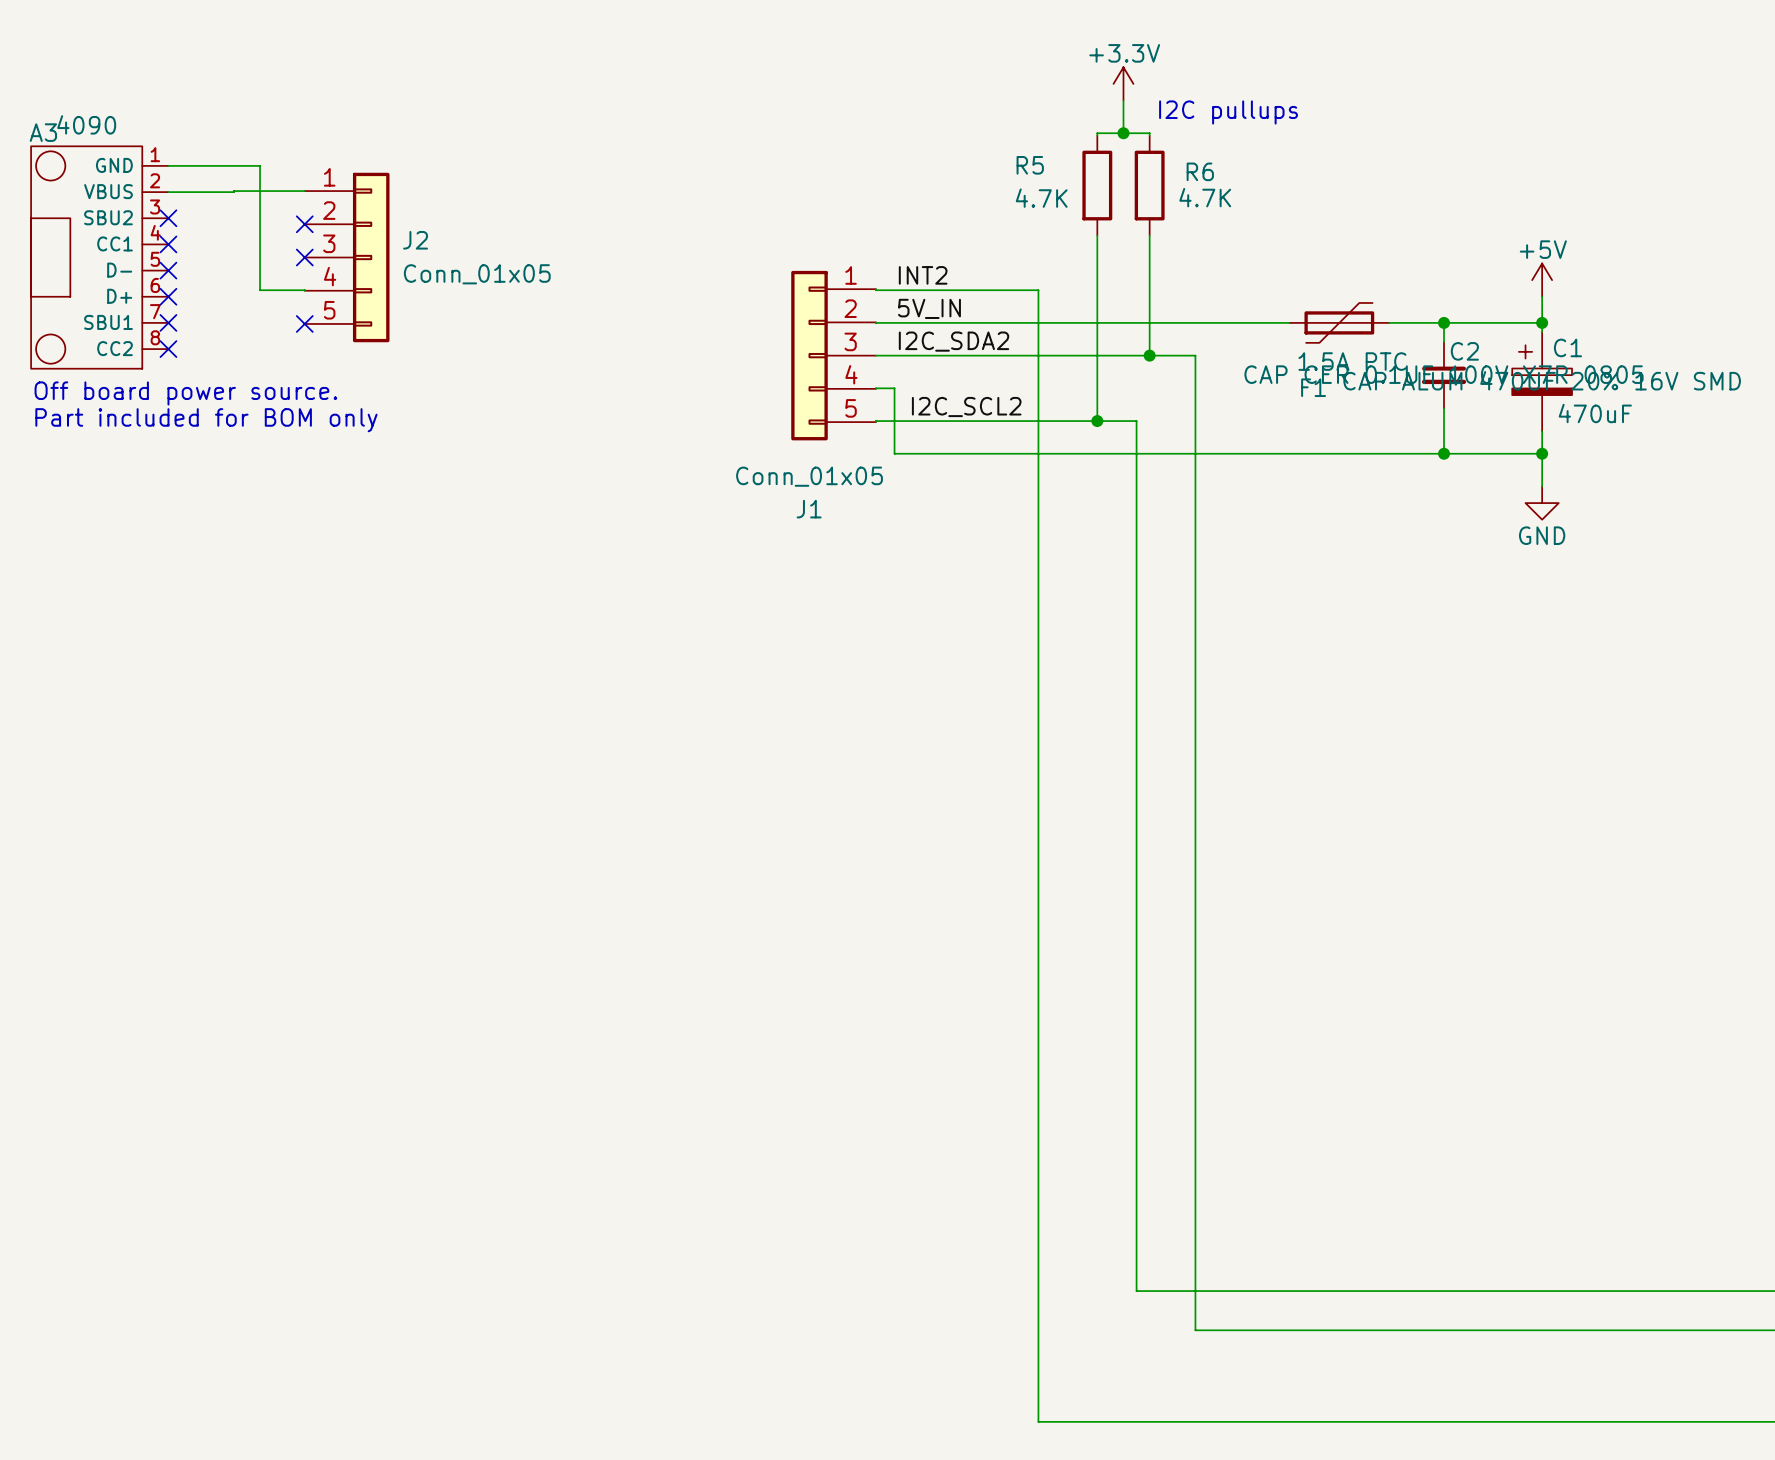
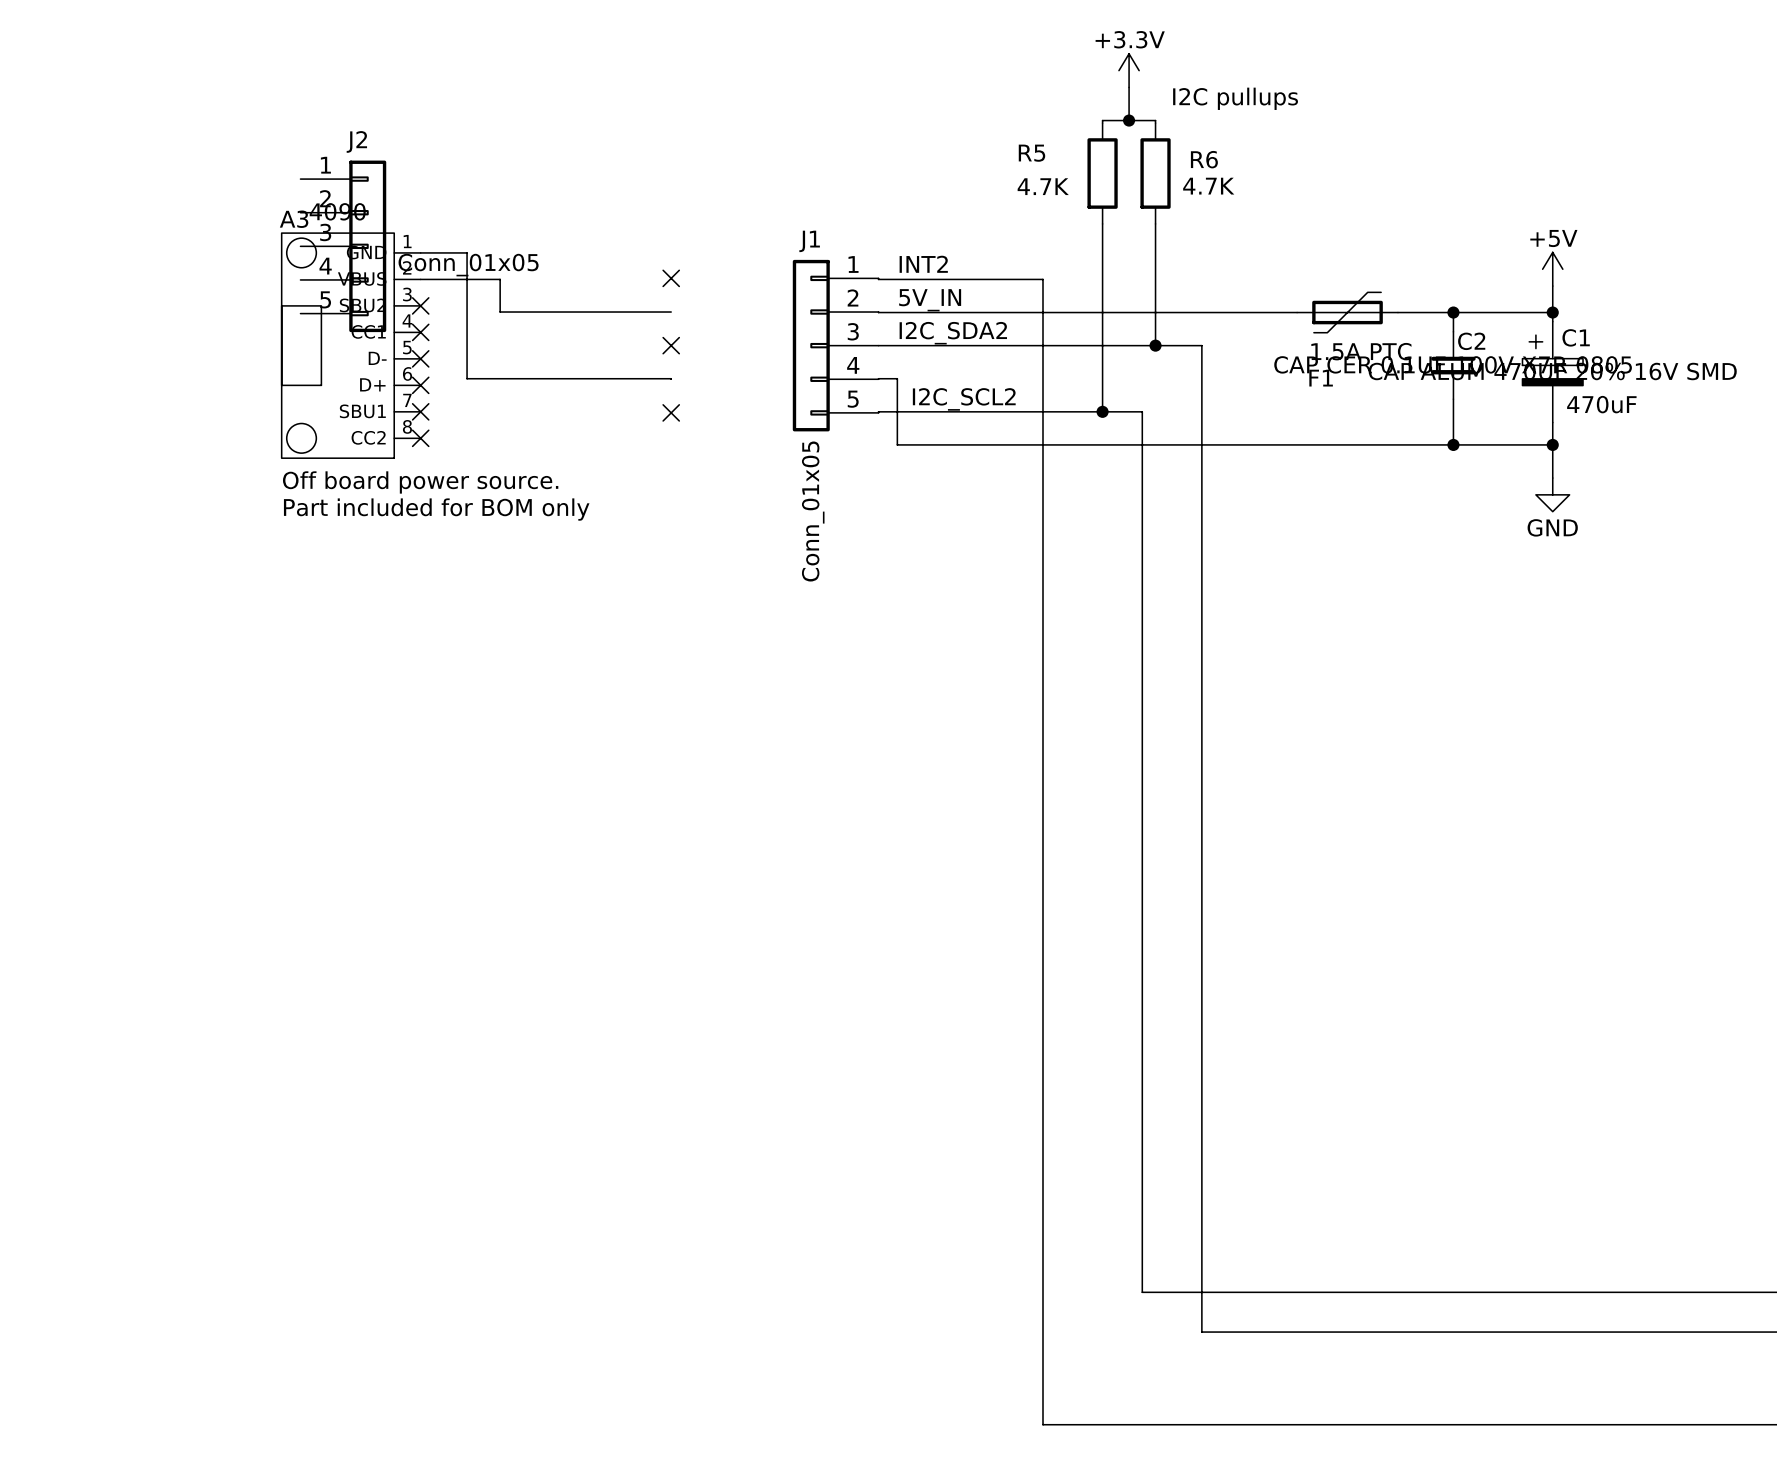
wire: (168, 165) (260, 165) (260, 290) (304, 290) -> none
wire: (304, 191) (168, 192) -> none
no-connect mark: (168, 218) -> none
no-connect mark: (304, 224) -> none
J2 name position: J2 (415, 240) -> J2 (356, 141)
no-connect mark: (168, 244) -> none
A3 position: (99, 257) -> (351, 345)
no-connect mark: (304, 257) -> none
wire: none -> (420, 252) (467, 252) (467, 378) (671, 379)
no-connect mark: (168, 270) -> none
no-connect mark: none -> (671, 278)
wire: none -> (420, 279) (500, 279) (500, 312) (671, 312)
no-connect mark: (168, 296) -> none
no-connect mark: none -> (420, 305)
no-connect mark: (168, 322) -> none
no-connect mark: (304, 323) -> none
no-connect mark: none -> (420, 332)
no-connect mark: (168, 349) -> none
no-connect mark: none -> (671, 345)
no-connect mark: none -> (420, 358)
text position: Off board power source. (185, 393) -> Off board power source. (420, 482)
no-connect mark: none -> (420, 385)
text position: Part included for BOM only (206, 420) -> Part included for BOM only (436, 509)
no-connect mark: none -> (420, 411)
no-connect mark: none -> (671, 412)
no-connect mark: none -> (420, 438)
J1 value rotation: 0° (809, 476) -> 90° counterclockwise (813, 511)
J1 name position: J1 (809, 509) -> J1 (809, 241)

